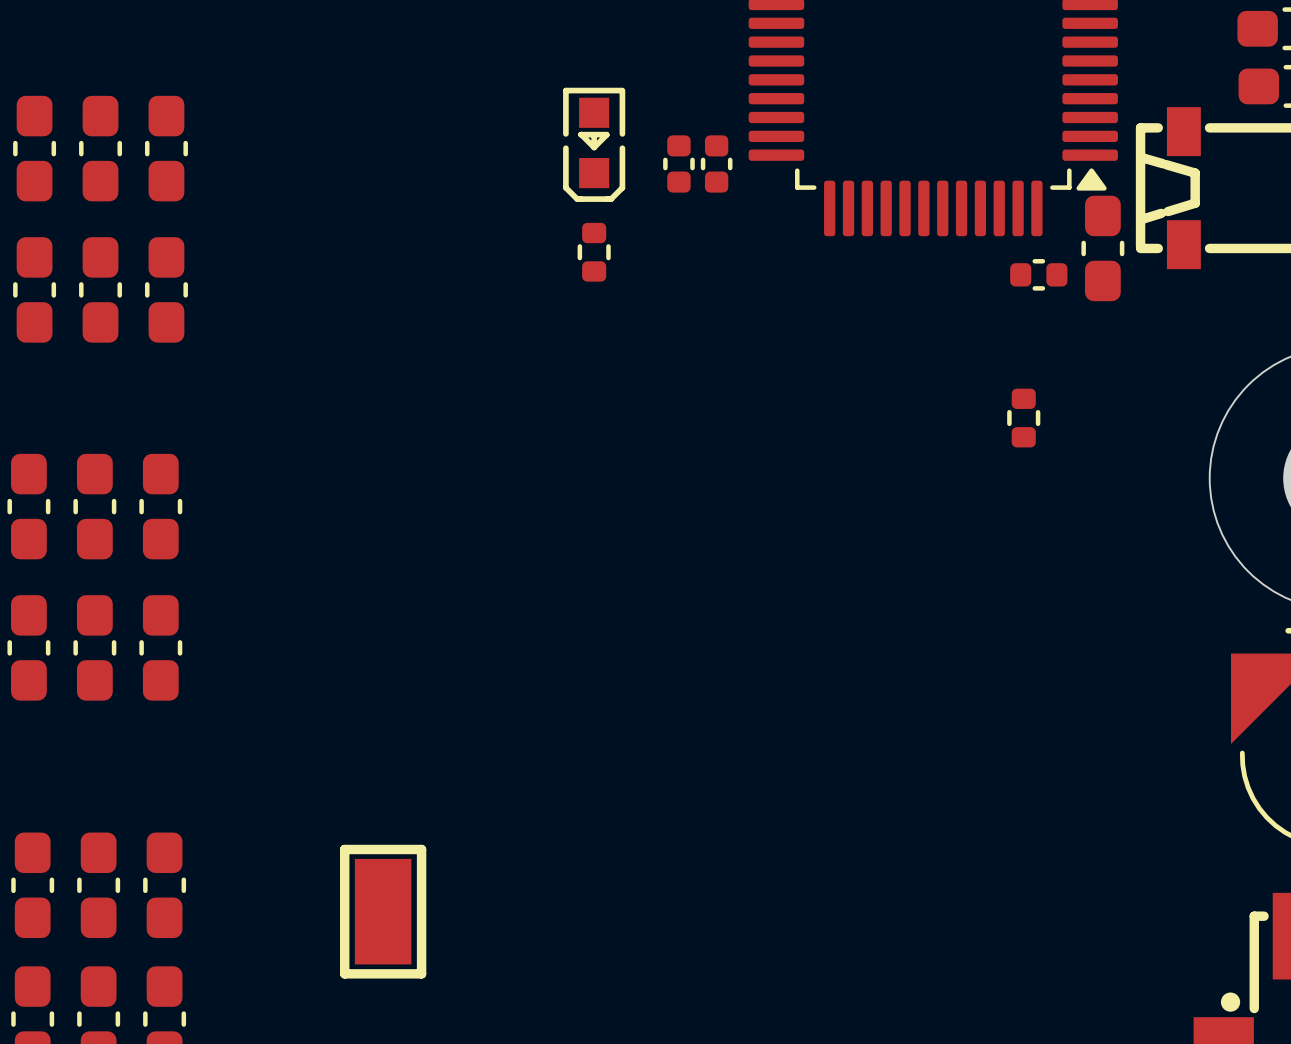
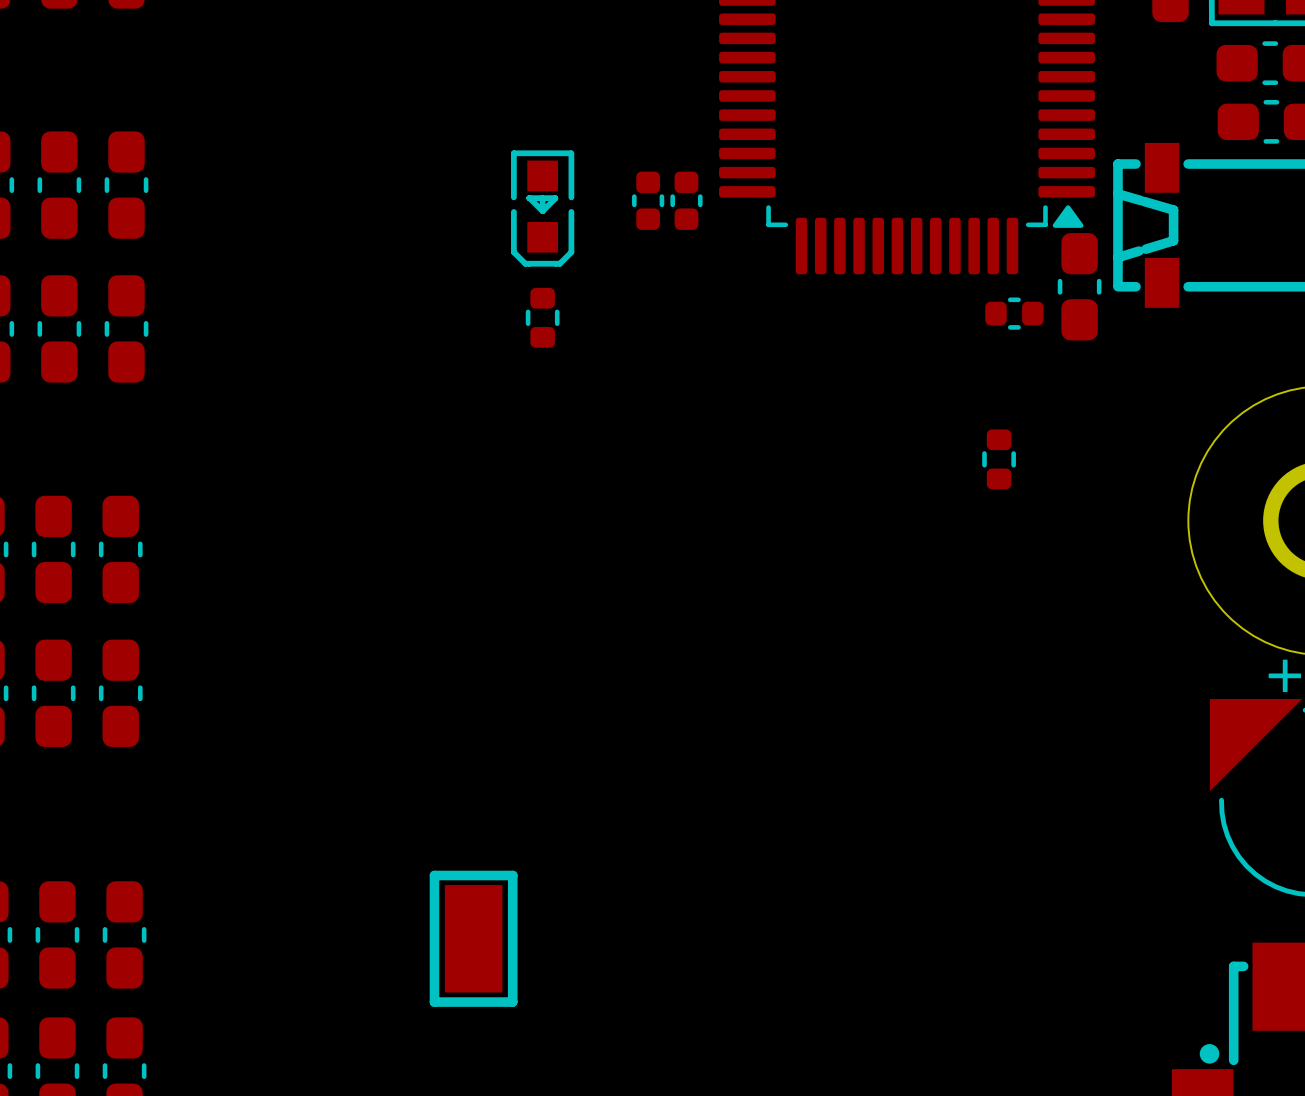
part position: (594, 144) -> (542, 208)
part position: (594, 252) -> (542, 317)
part position: (383, 911) -> (473, 938)

